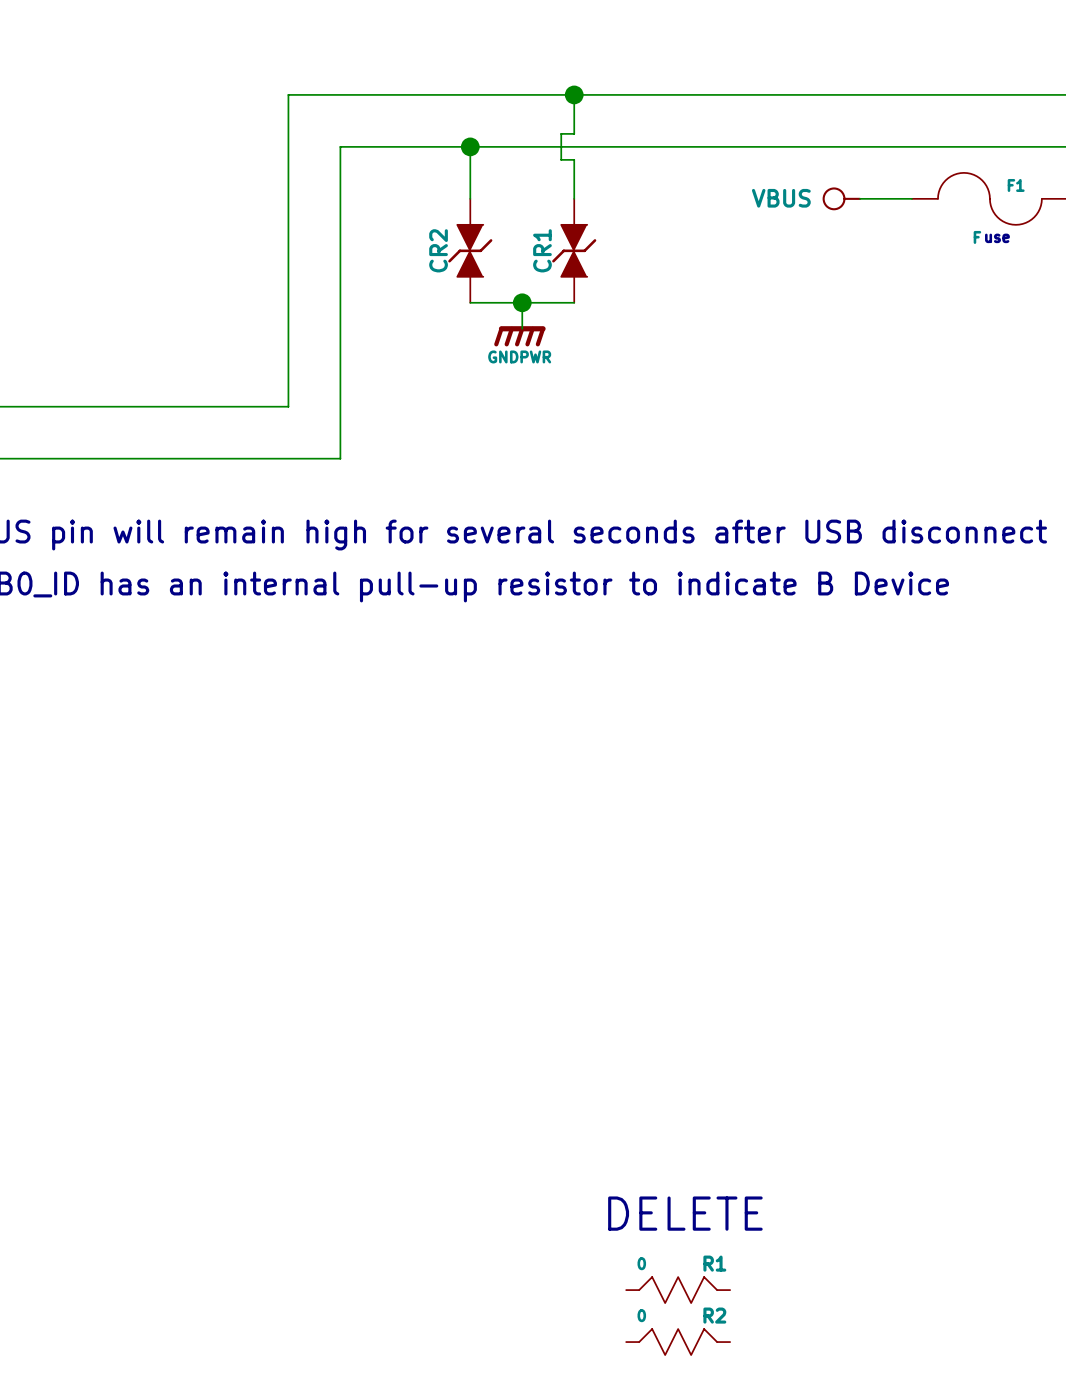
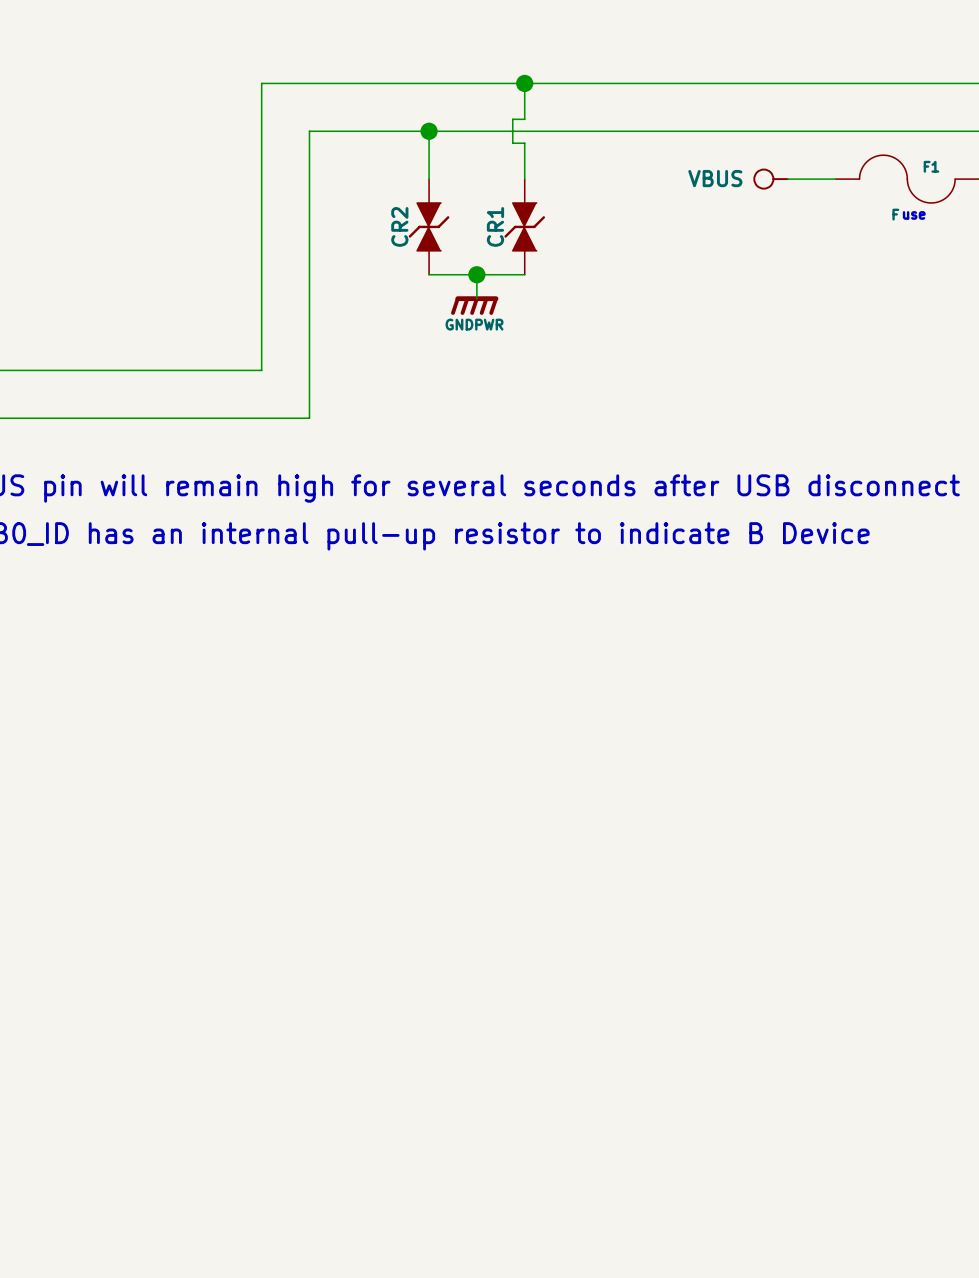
text: DELETE (685, 1213) -> none
R1: 0 (678, 1290) -> none
R2: 0 (678, 1342) -> none

